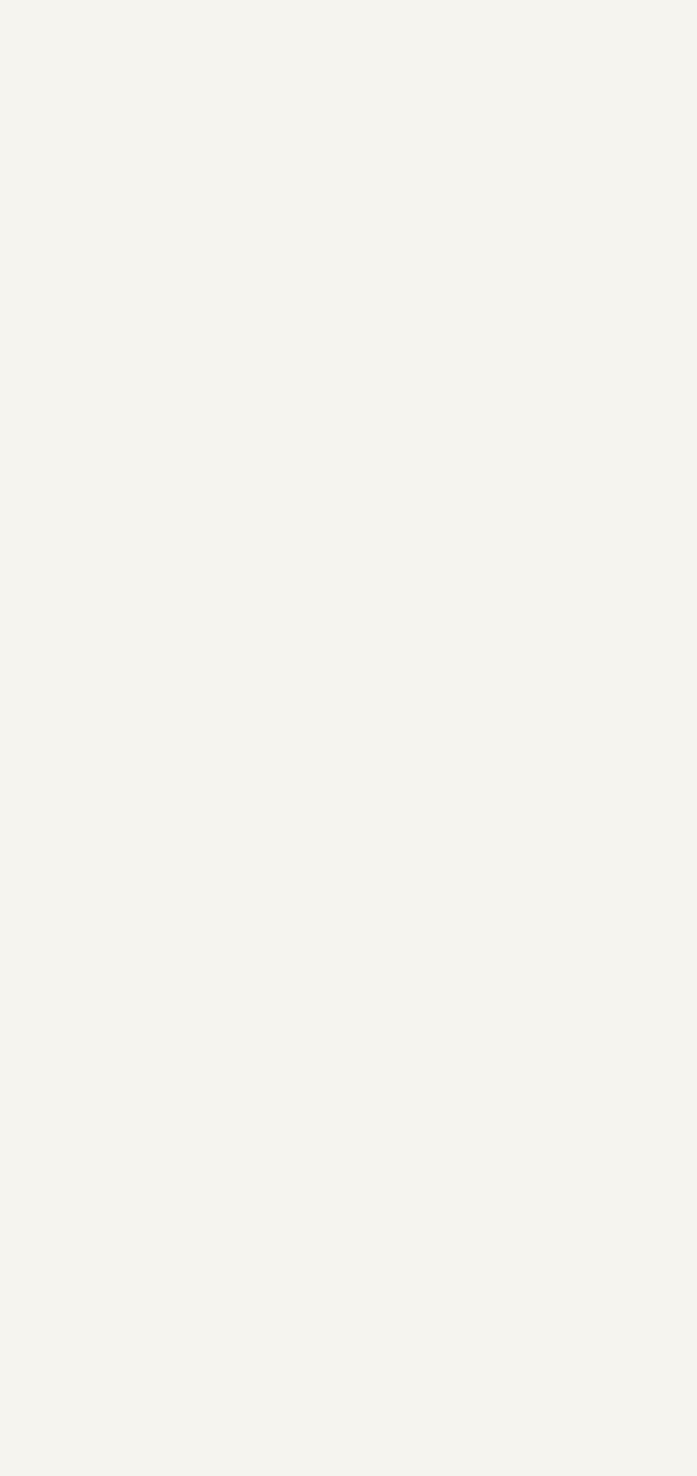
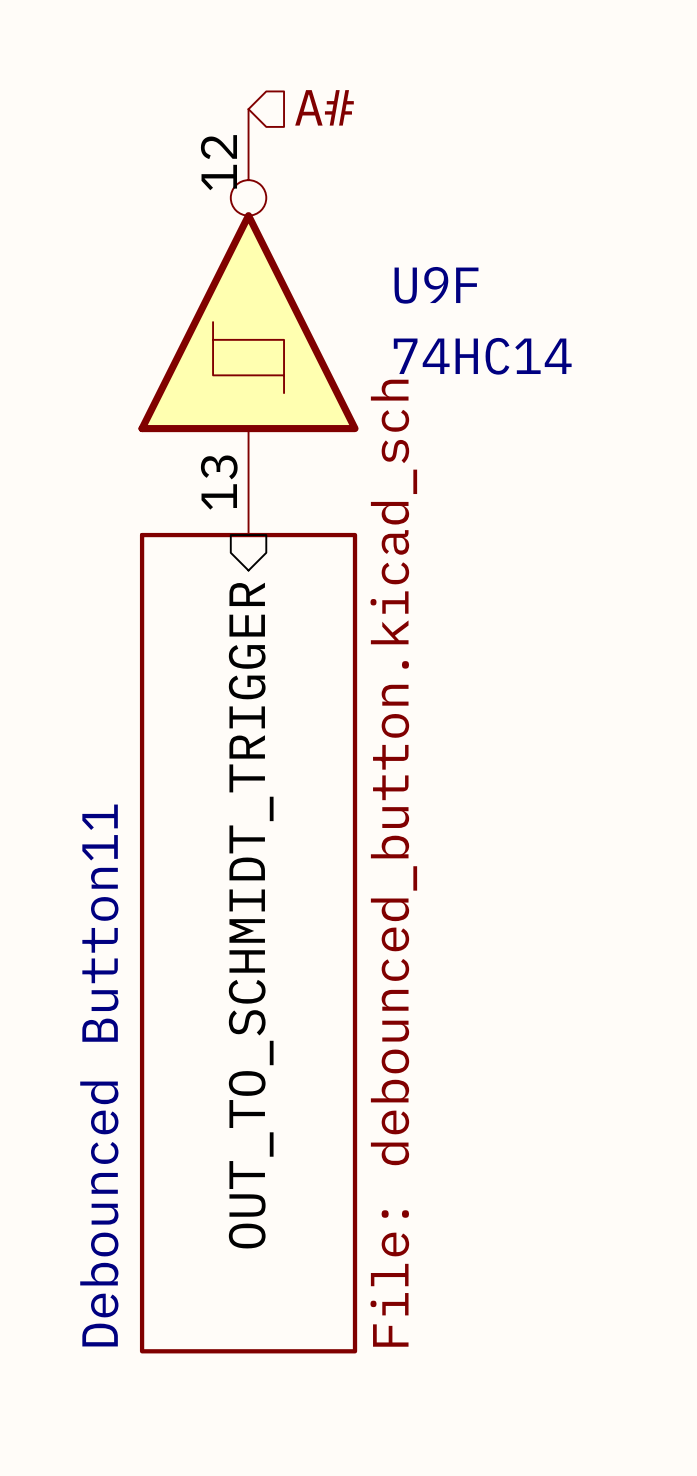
hierarchical label: none -> A# (324, 107)
U9F: none -> 74HC14 (248, 322)
sheet pin: none -> OUT_TO_SCHMIDT_TRIGGER (251, 915)
sheet Debounced Button11: none -> File: debounced_button.kicad_sch (248, 943)

